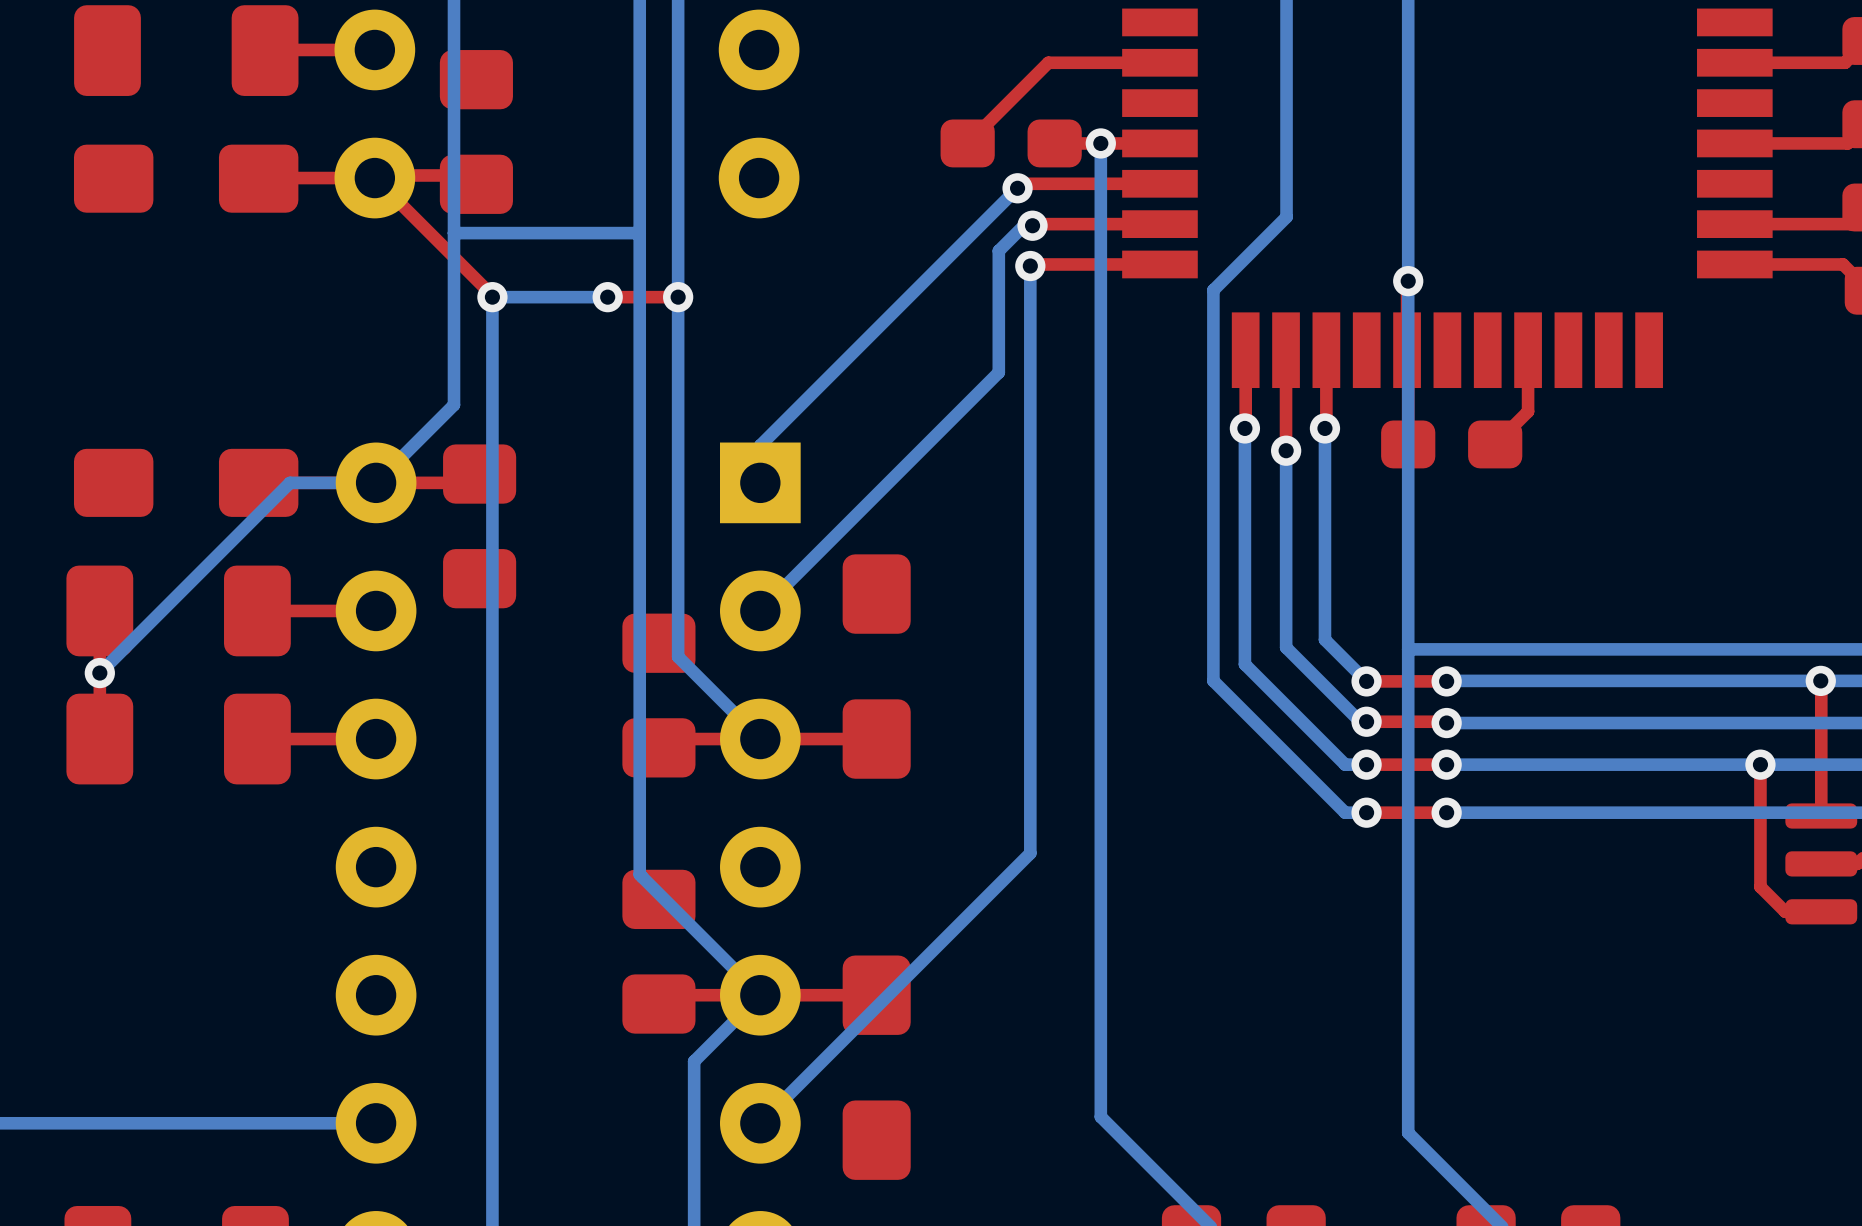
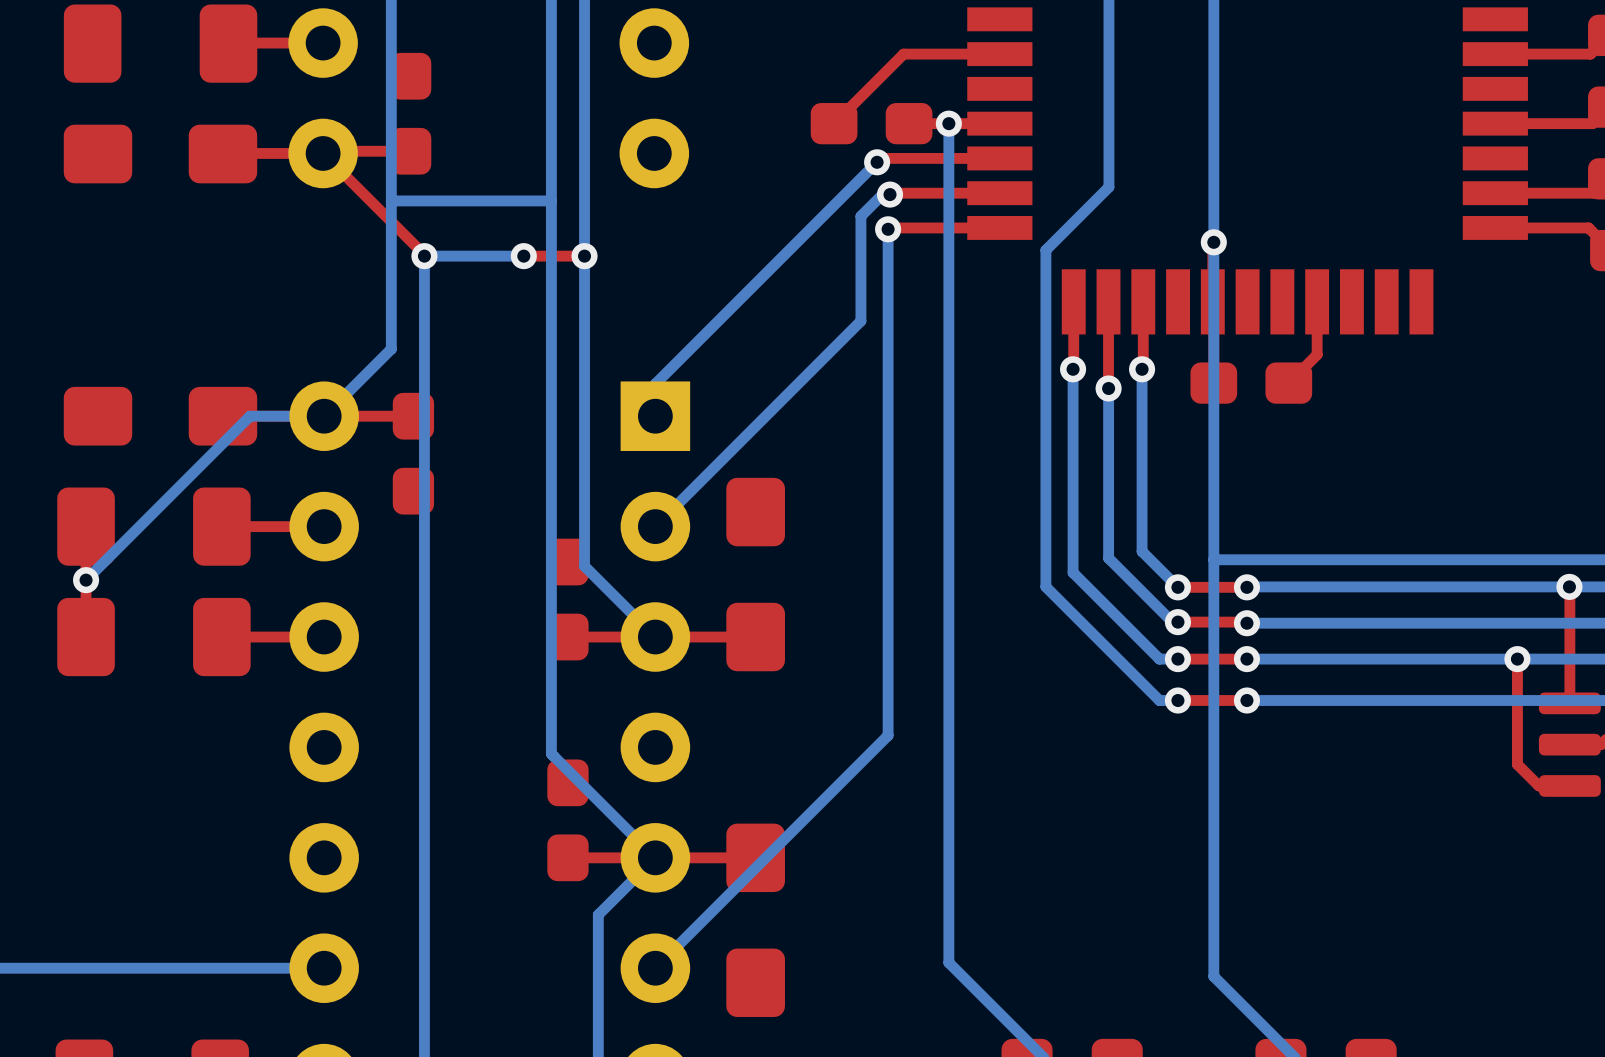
part footprint: [439, 50, 513, 214] -> [390, 52, 432, 175]
part footprint: [443, 444, 517, 609] -> [392, 392, 435, 515]
part footprint: [622, 613, 696, 778] -> [547, 538, 589, 661]
part footprint: [622, 869, 696, 1034] -> [547, 759, 589, 882]

